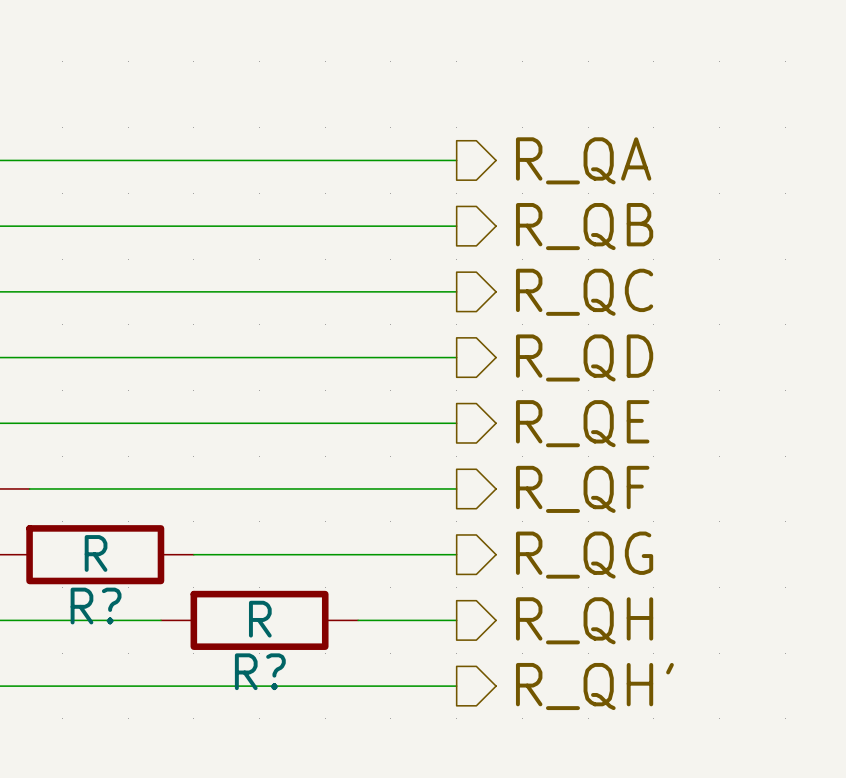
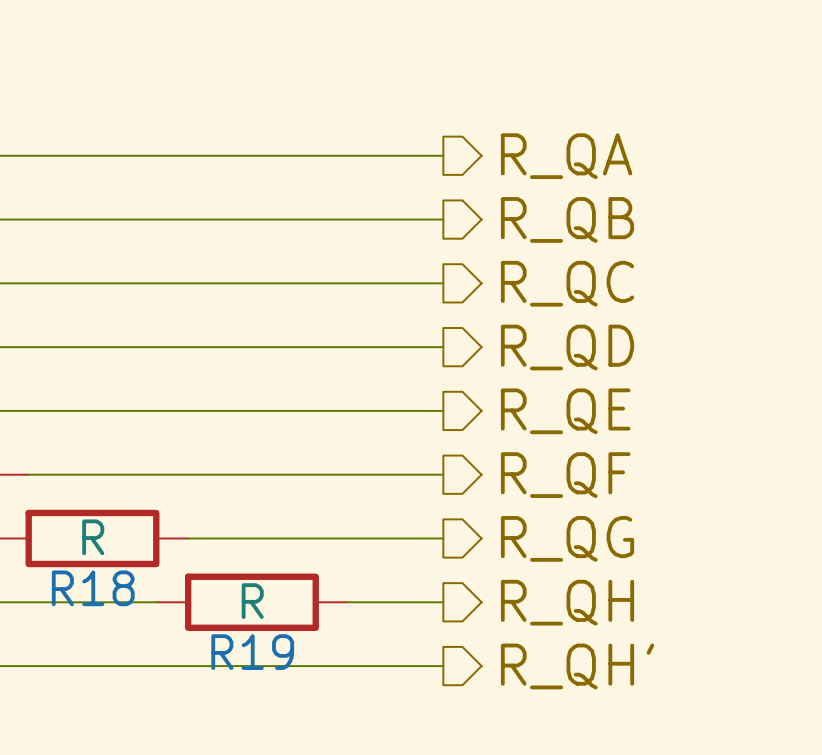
R? name: R? (96, 606) -> R18 (93, 588)
R? name: R? (260, 671) -> R19 (252, 652)

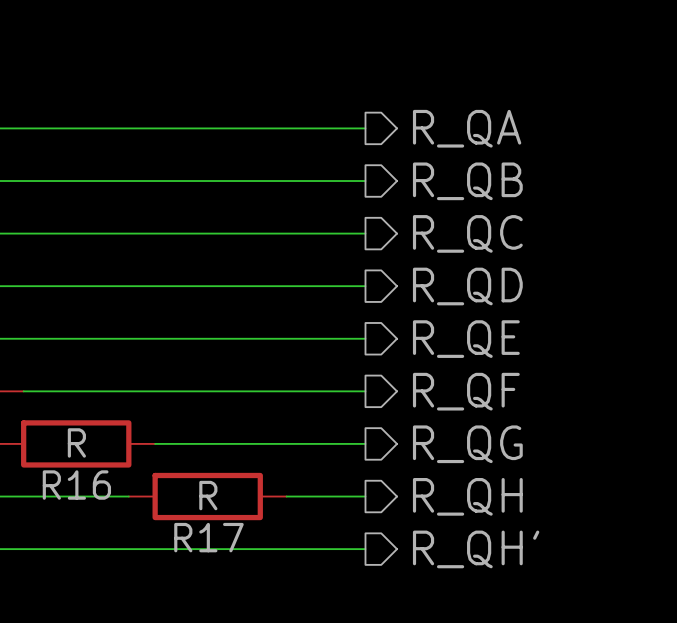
R18 name: R18 (93, 588) -> R16 (76, 485)
R19 name: R19 (252, 652) -> R17 (208, 537)

